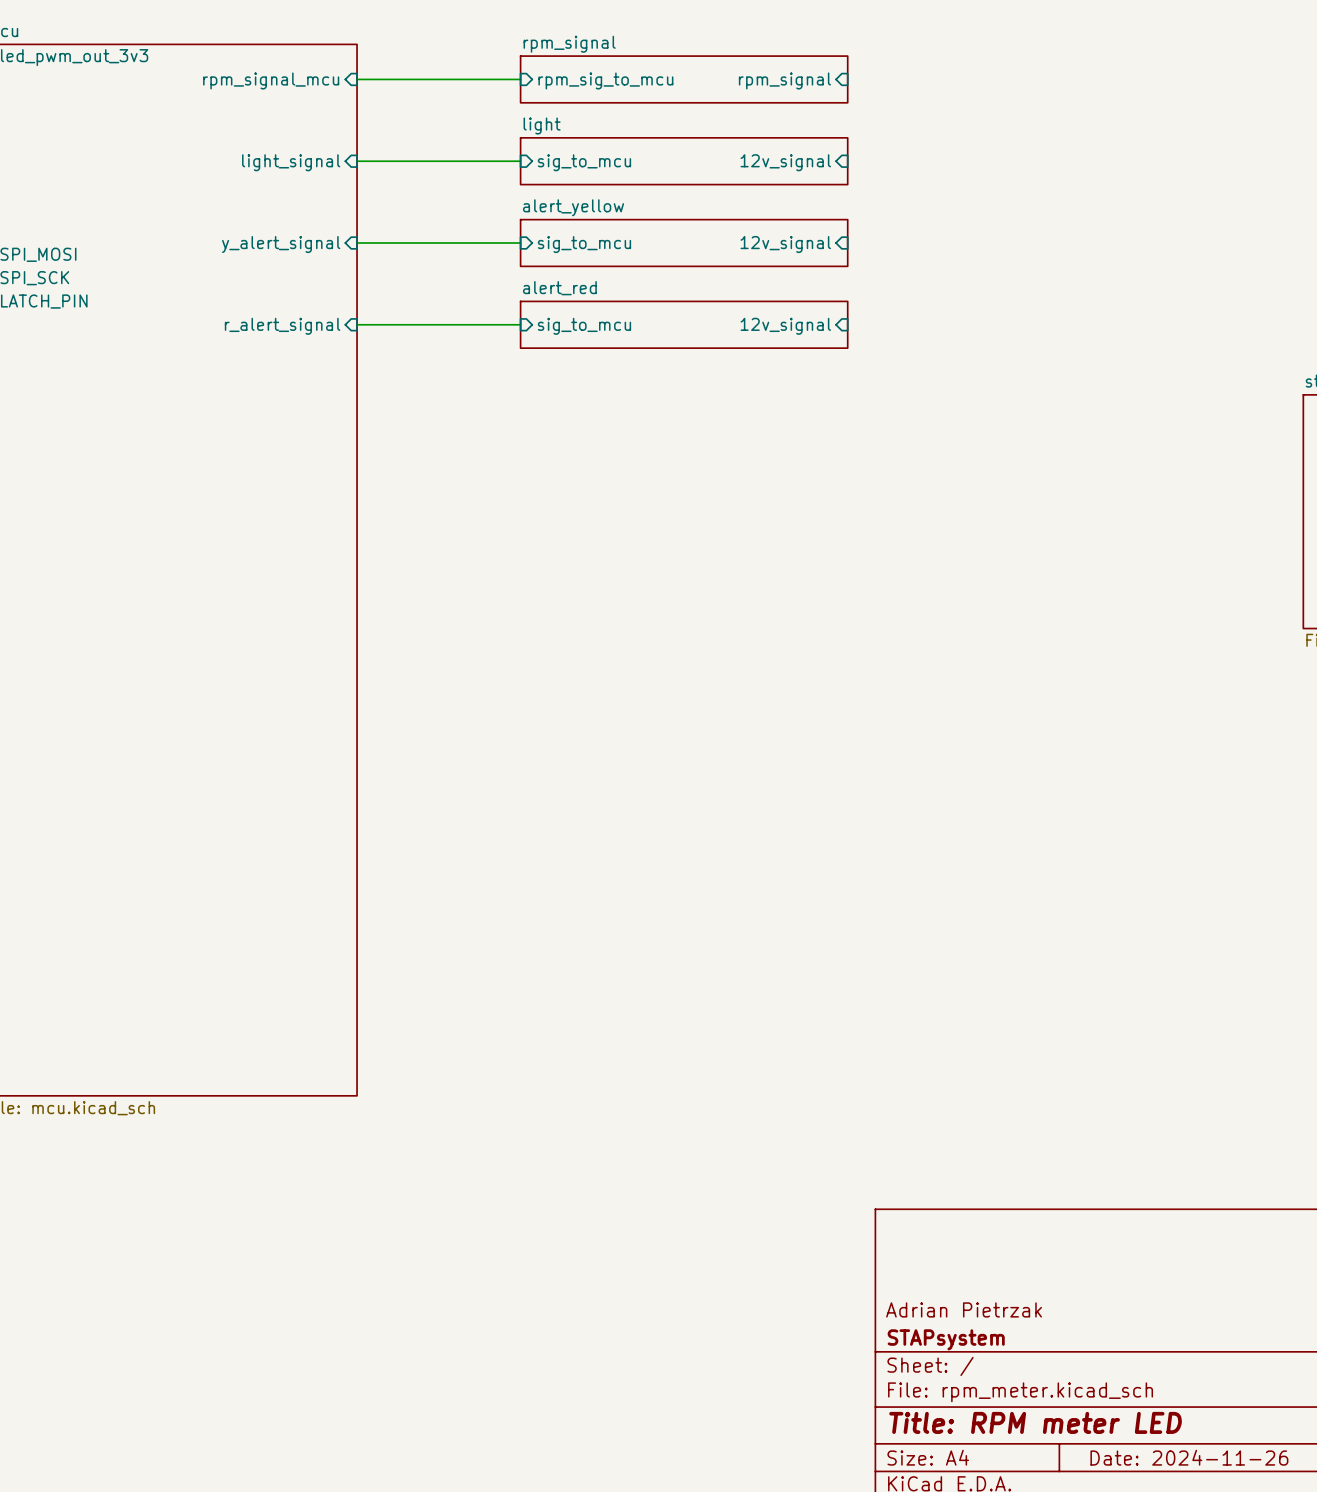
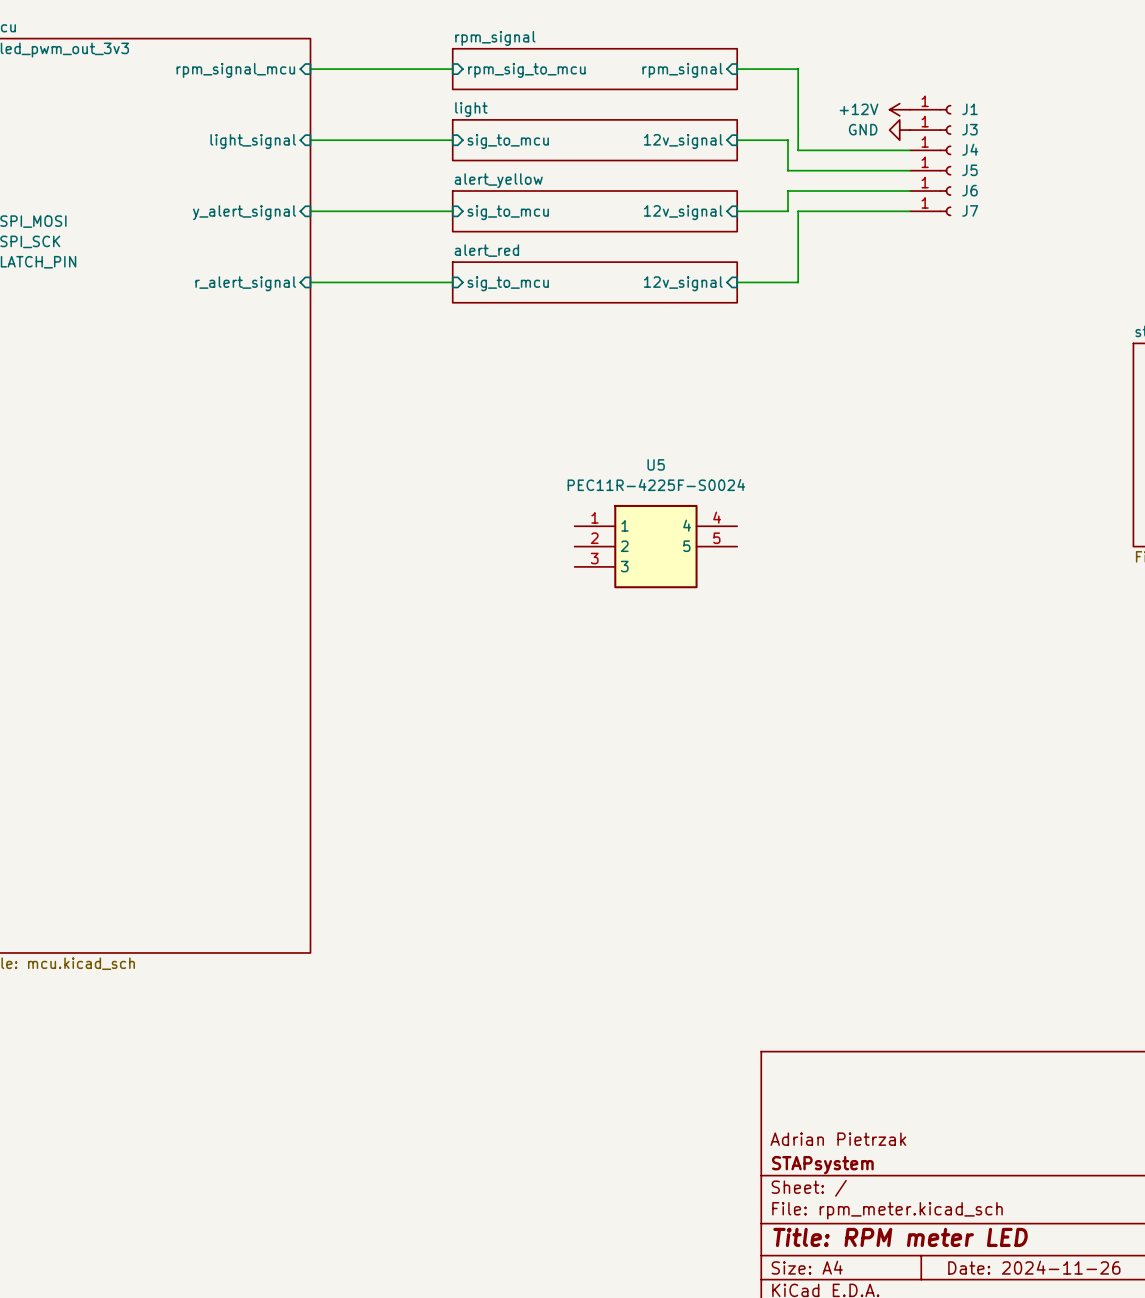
wire: none -> (737, 69) (798, 69) (798, 150) (909, 150)
power symbol: none -> +12V (899, 109)
J1: none -> (930, 109)
power symbol: none -> GND (899, 130)
J3: none -> (930, 130)
wire: none -> (737, 140) (787, 140) (787, 170) (909, 170)
J4: none -> (930, 150)
J5: none -> (930, 170)
wire: none -> (909, 191) (787, 191) (787, 211) (737, 211)
J6: none -> (930, 191)
wire: none -> (909, 211) (798, 211) (798, 282) (737, 282)
J7: none -> (930, 211)
U5: none -> PEC11R-4225F-S0024 (655, 546)

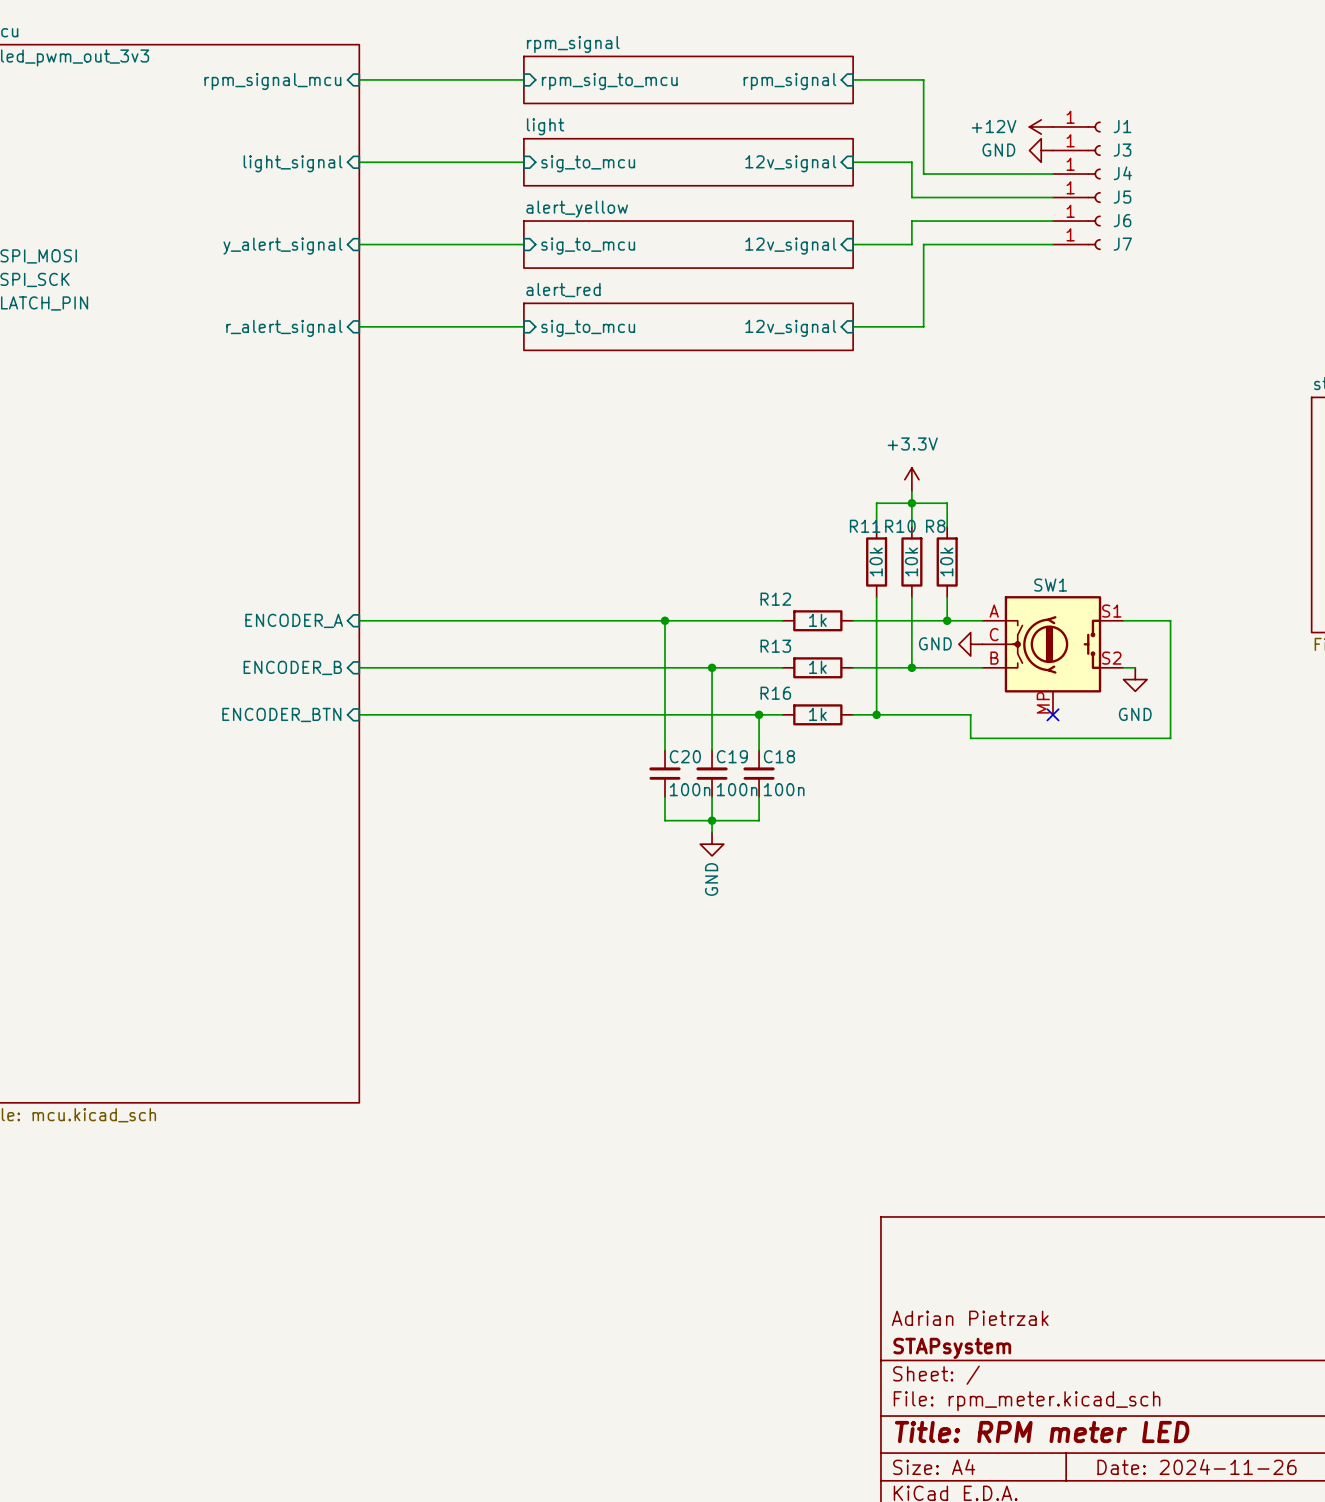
power symbol: none -> +3.3V (911, 479)
wire: none -> (911, 491) (911, 526)
junction: none -> (911, 503)
wire: none -> (876, 526) (876, 503) (947, 503) (947, 526)
R11: none -> 10k (876, 562)
R10: none -> 10k (911, 562)
R8: none -> 10k (947, 562)
wire: none -> (876, 597) (876, 714)
wire: none -> (911, 597) (911, 667)
wire: none -> (947, 597) (947, 620)
sheet pin: none -> ENCODER_A (294, 620)
wire: none -> (359, 620) (782, 620)
wire: none -> (665, 620) (665, 750)
junction: none -> (665, 620)
R12: none -> 1k (817, 620)
wire: none -> (853, 620) (982, 620)
junction: none -> (947, 620)
wire: none -> (1123, 620) (1170, 620) (1170, 738) (970, 738) (970, 714) (853, 714)
U5: PEC11R-4225F-S0024 (655, 546) -> none
power symbol: none -> GND (970, 644)
SW1: none -> (1052, 655)
sheet pin: none -> ENCODER_B (292, 667)
wire: none -> (359, 667) (782, 667)
wire: none -> (712, 667) (712, 750)
junction: none -> (712, 667)
R13: none -> 1k (817, 667)
wire: none -> (853, 667) (982, 667)
junction: none -> (911, 667)
wire: none -> (1123, 667) (1135, 667)
power symbol: none -> GND (1135, 679)
sheet pin: none -> ENCODER_BTN (281, 714)
wire: none -> (359, 714) (782, 714)
wire: none -> (759, 714) (759, 750)
junction: none -> (759, 714)
R16: none -> 1k (817, 714)
junction: none -> (876, 714)
no-connect mark: none -> (1052, 714)
C20: none -> 100n (665, 773)
C19: none -> 100n (712, 773)
C18: none -> 100n (759, 773)
wire: none -> (665, 797) (665, 820) (759, 820) (759, 797)
wire: none -> (712, 797) (712, 832)
junction: none -> (712, 820)
power symbol: none -> GND (712, 844)

